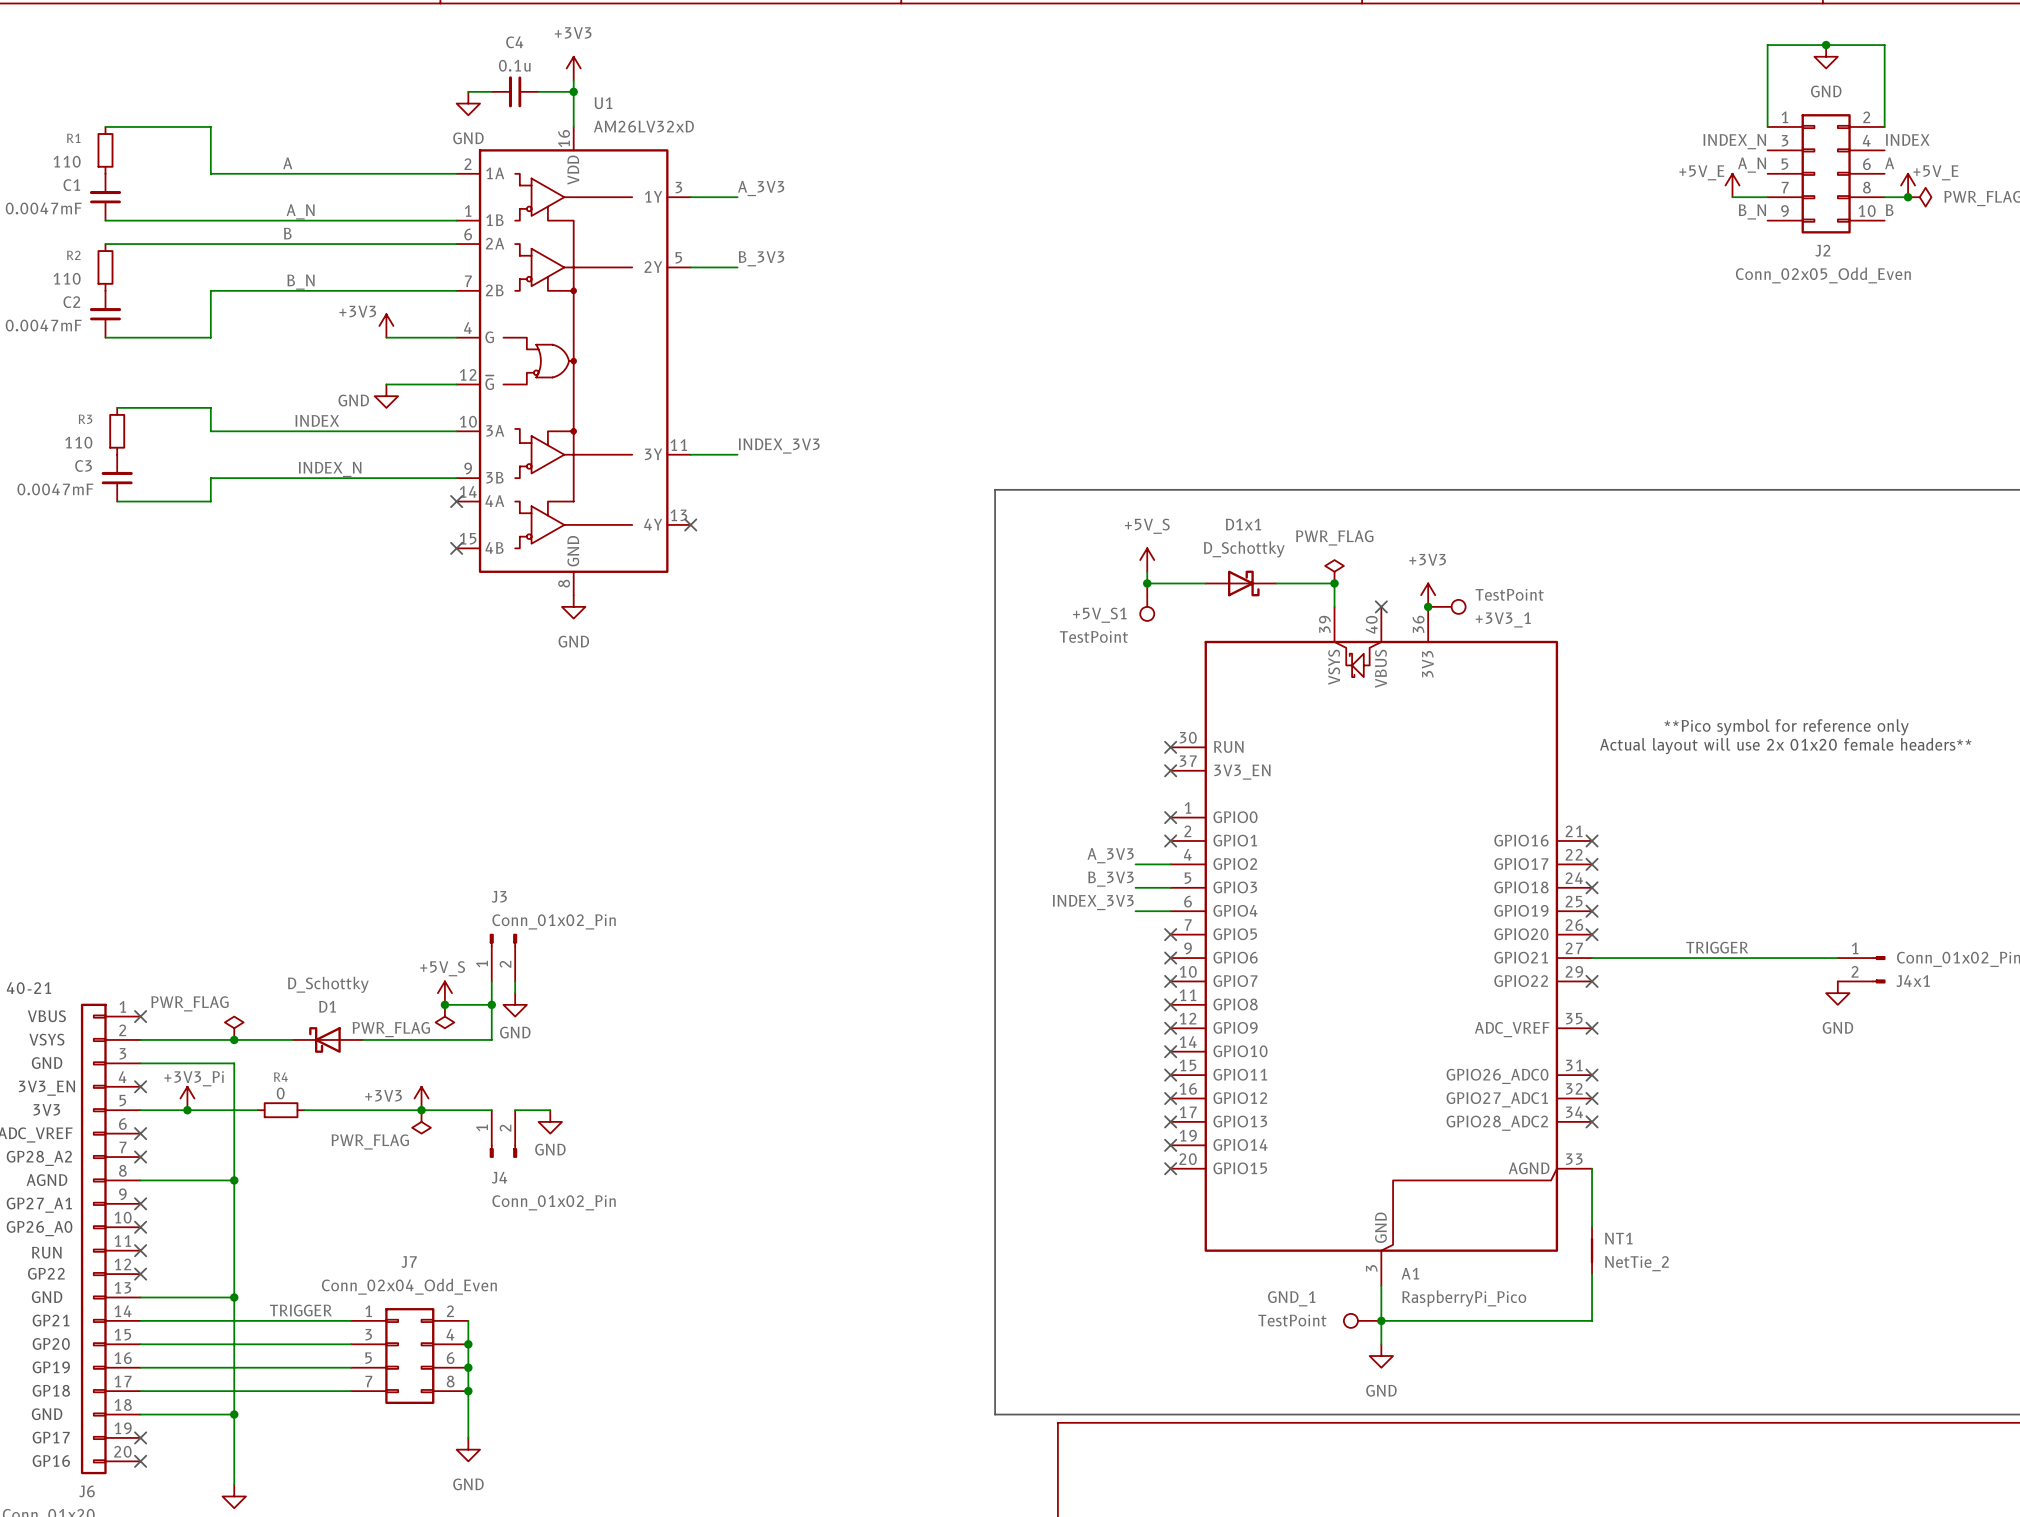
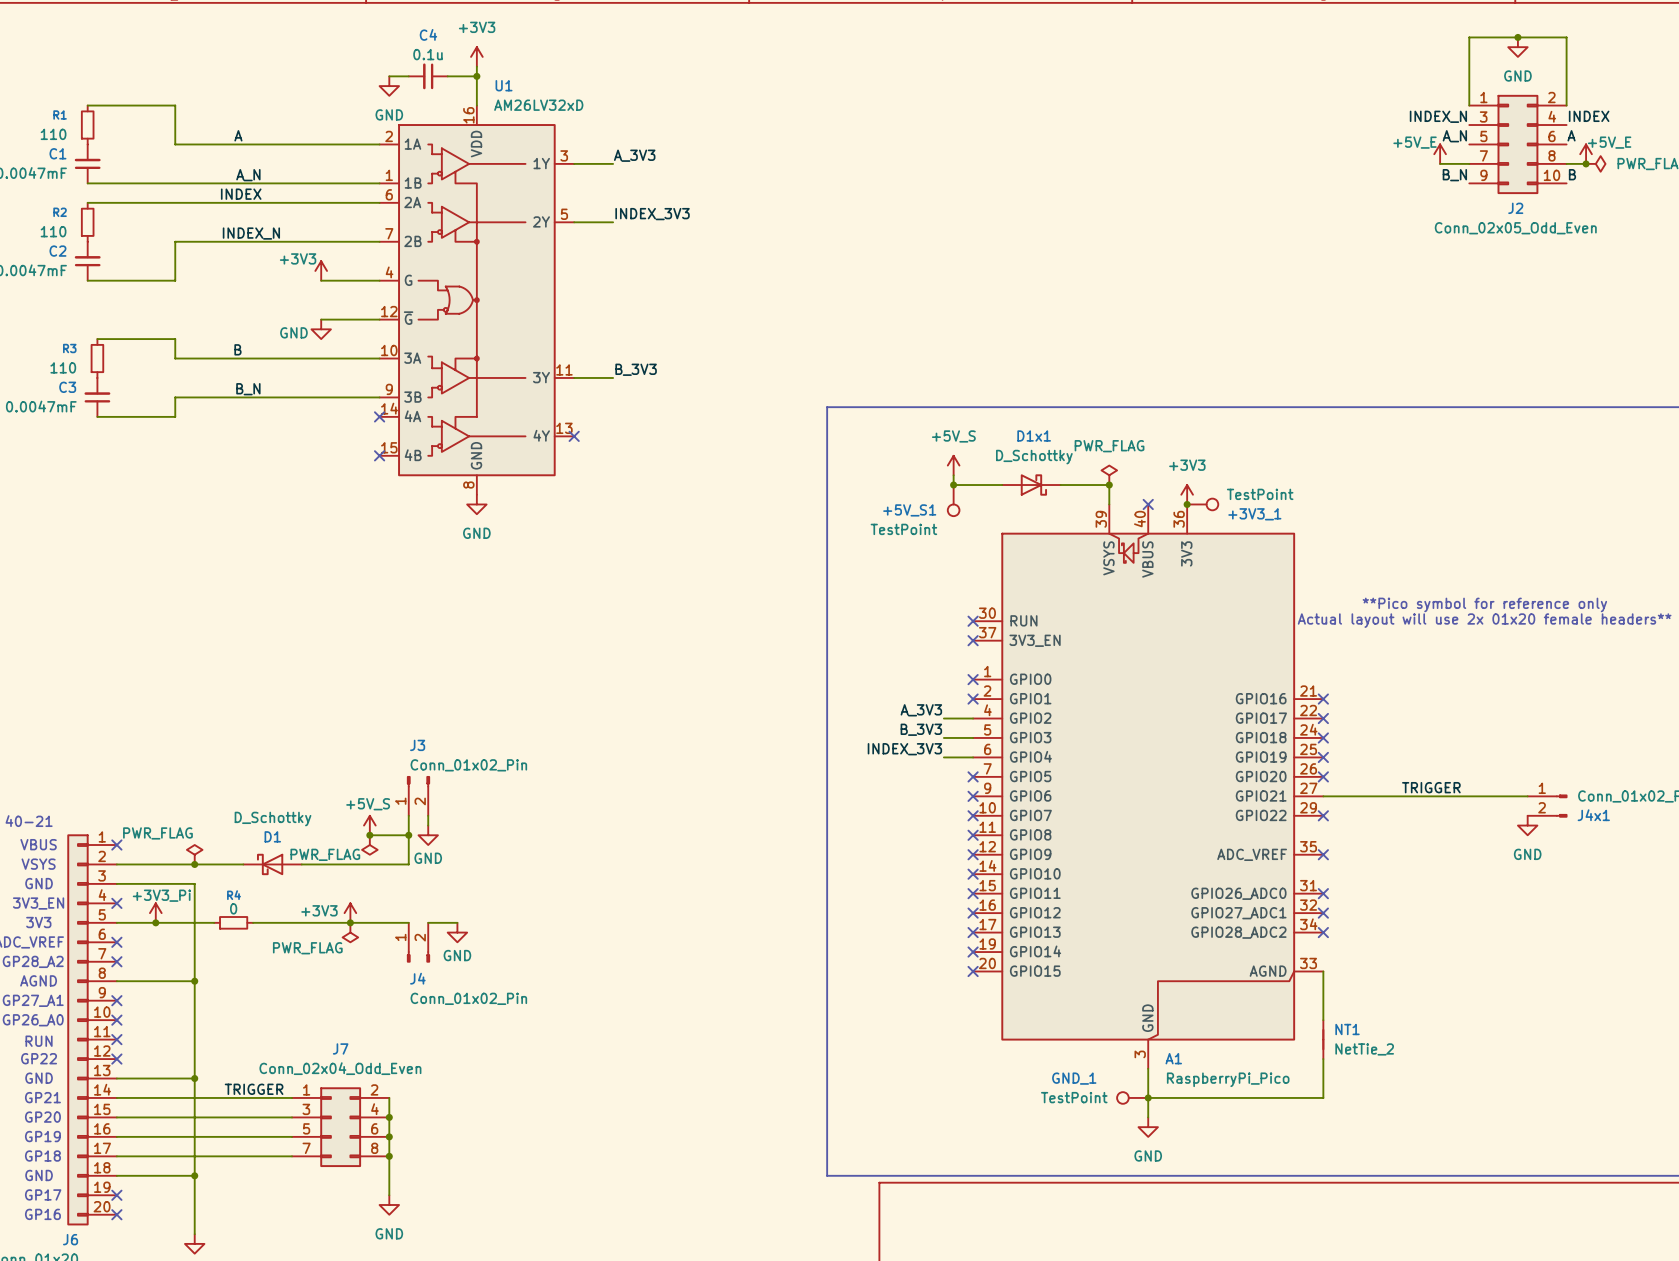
label position: B (287, 233) -> B (237, 349)
label: B_3V3 (761, 258) -> INDEX_3V3 (652, 214)
label position: B_N (300, 282) -> B_N (248, 389)
label position: INDEX (317, 420) -> INDEX (241, 194)
label: INDEX_3V3 (779, 446) -> B_3V3 (636, 369)
label position: INDEX_N (330, 469) -> INDEX_N (251, 233)

